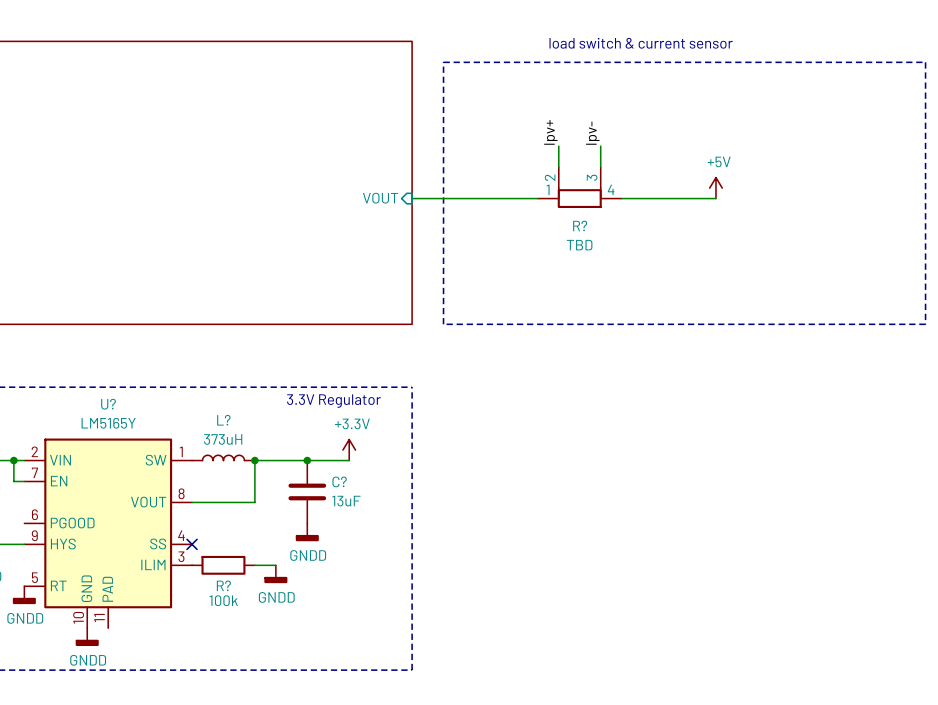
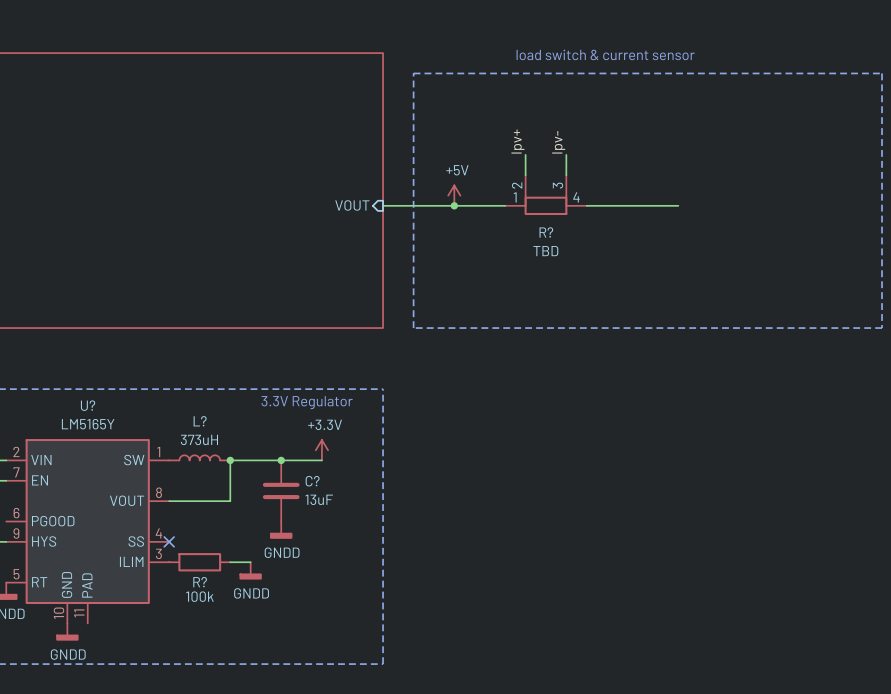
power symbol: none -> +5V (454, 195)
power symbol: +5V (715, 188) -> none
junction: none -> (454, 205)

